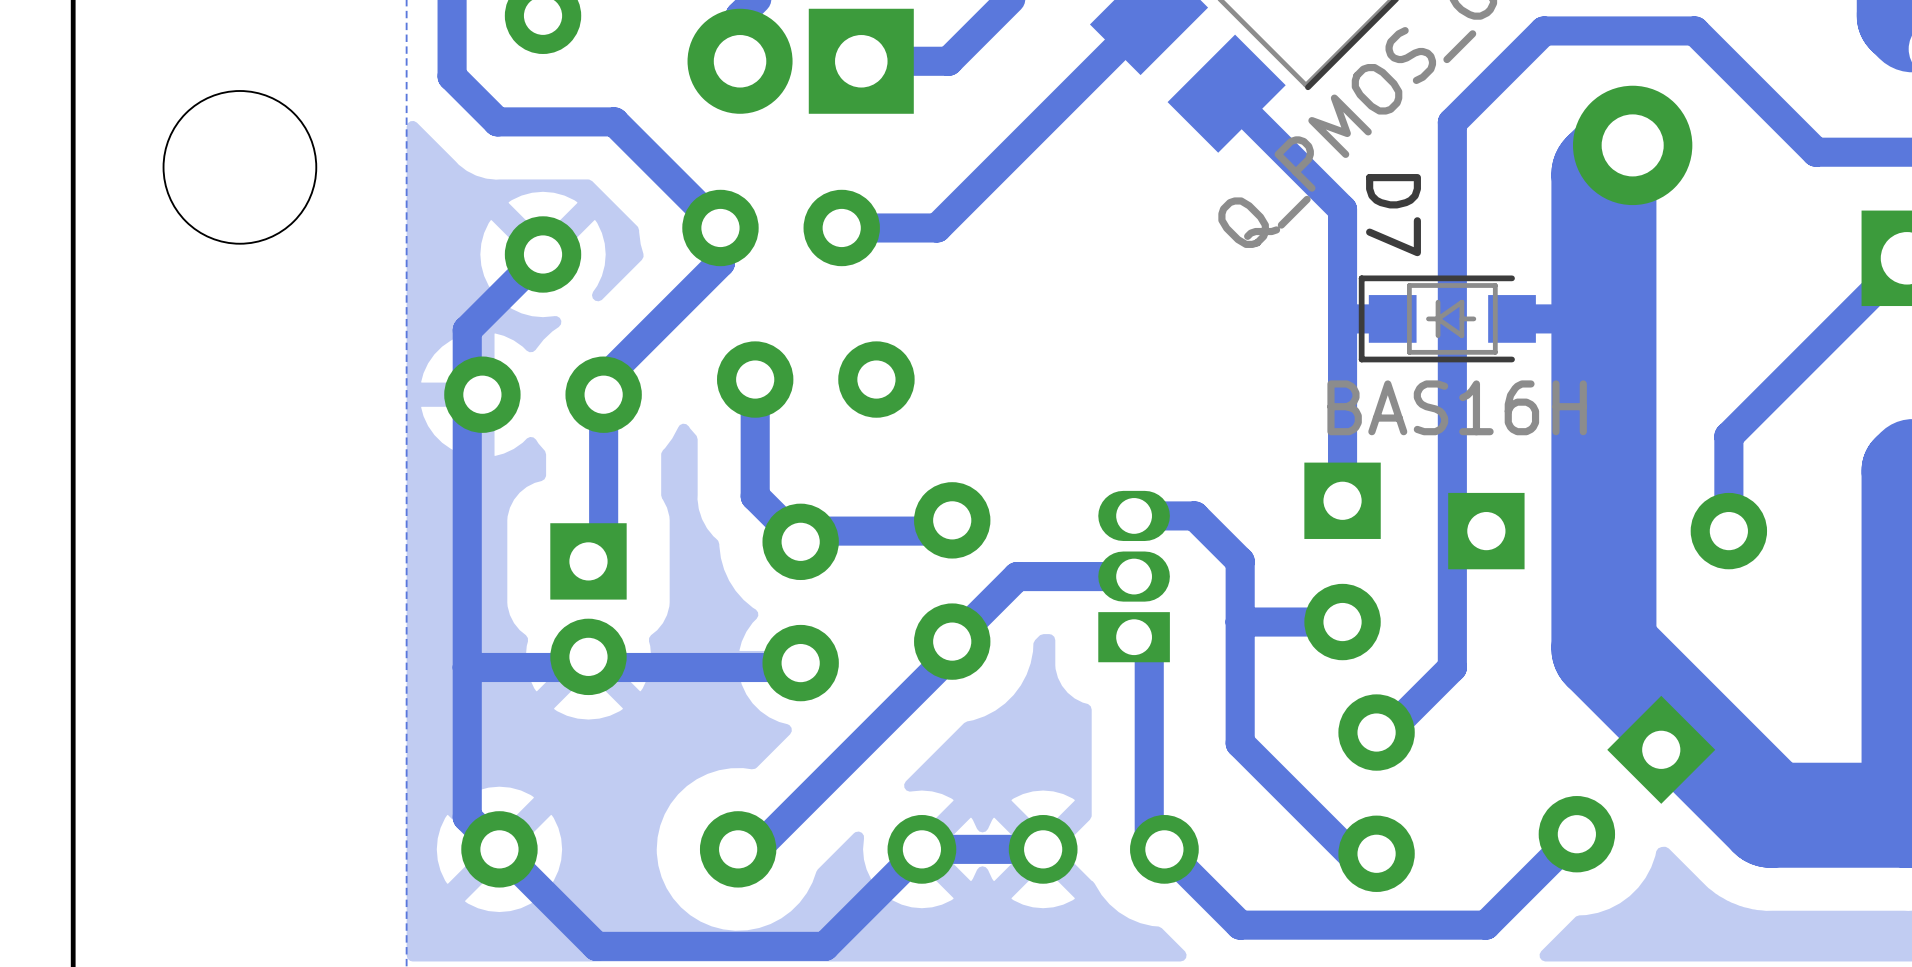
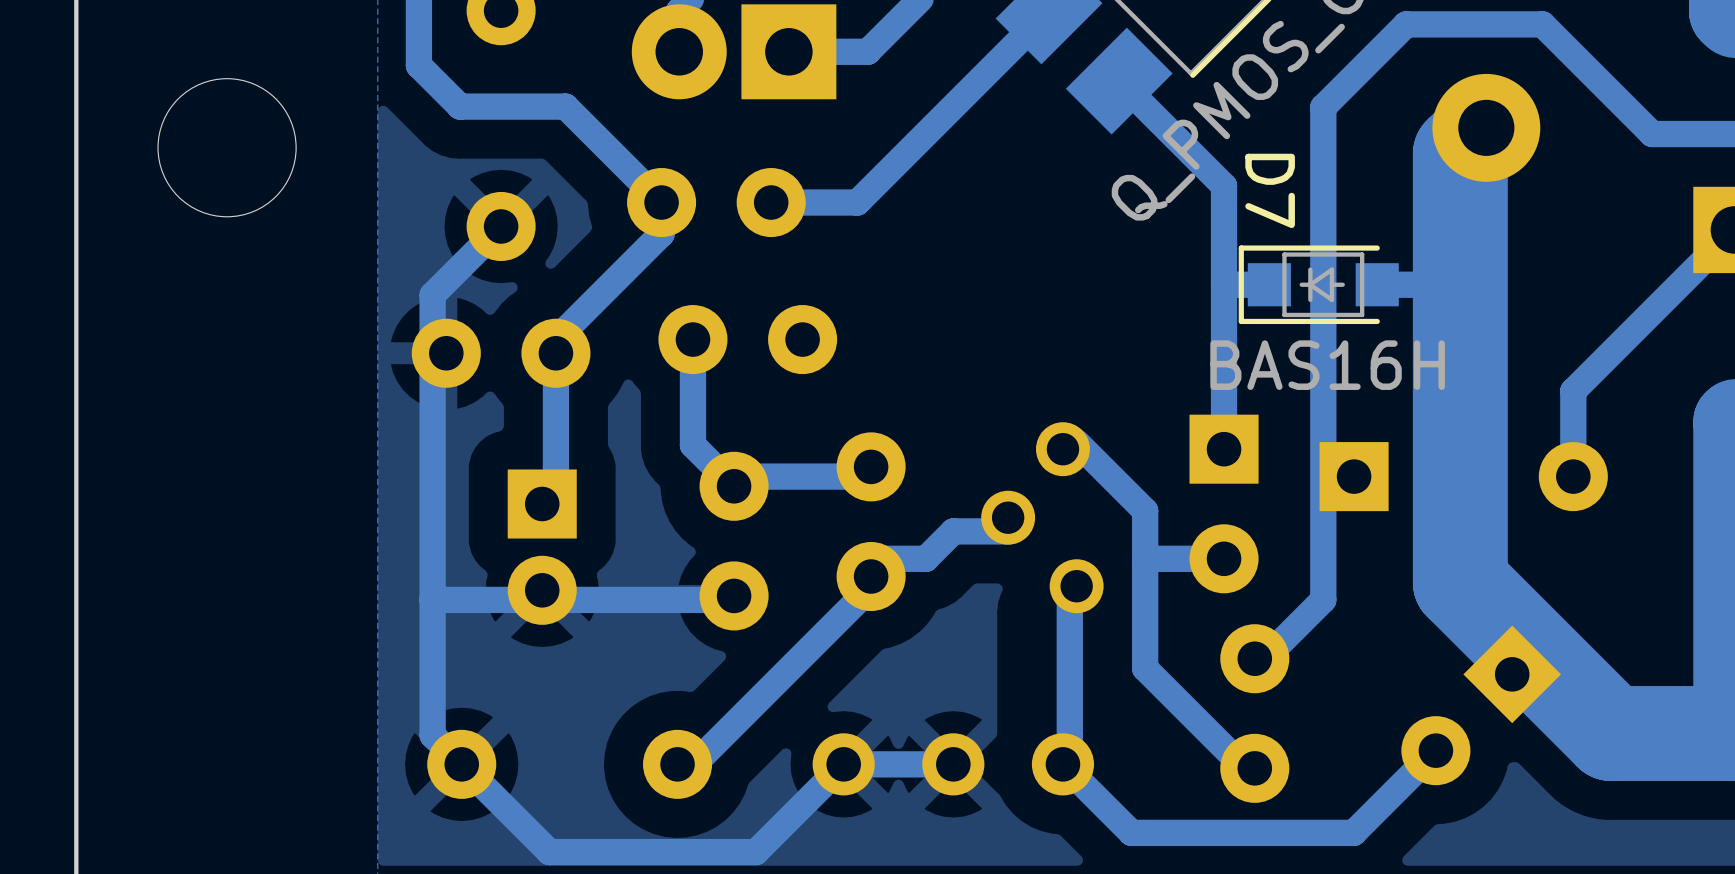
part footprint: [1098, 490, 1170, 663] -> [981, 422, 1104, 614]
track: none -> (1076, 442) (1145, 510) (1145, 668) (1245, 768) (1254, 768)
track: (1134, 515) (1194, 515) (1240, 561) (1240, 743) (1361, 864) -> none
track: (1134, 576) (1017, 576) (952, 641) (952, 653) -> none
track: none -> (1008, 531) (953, 531) (925, 558) (871, 558)
track: (1134, 637) (1149, 637) (1149, 834) (1164, 849) -> (1076, 586) (1069, 593) (1069, 757) (1062, 764)

